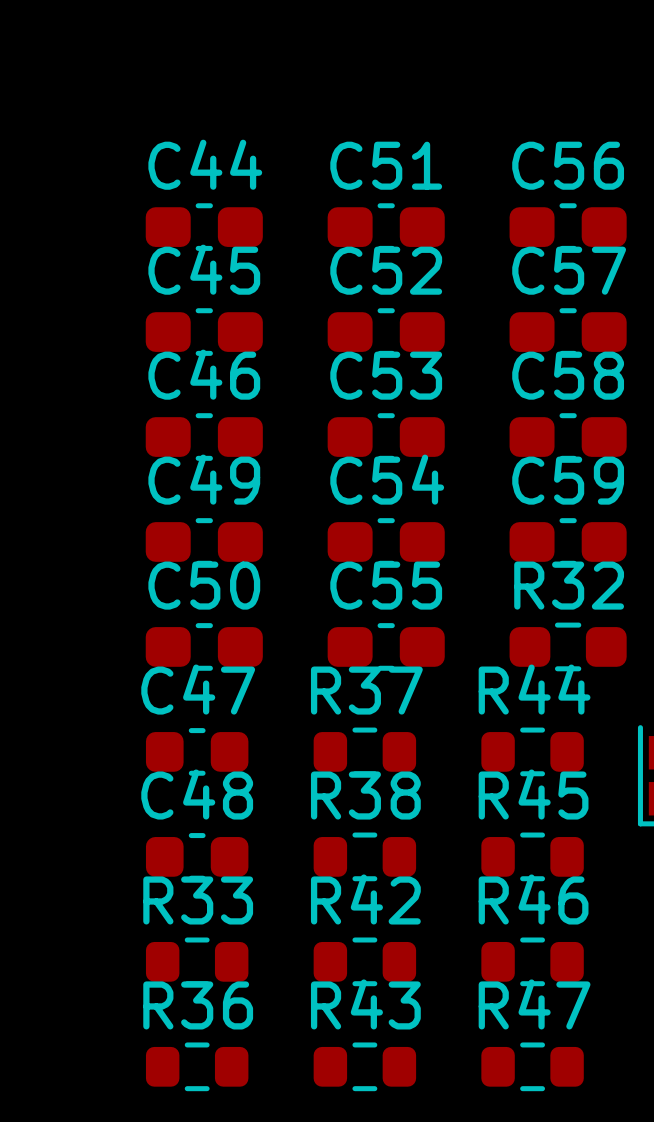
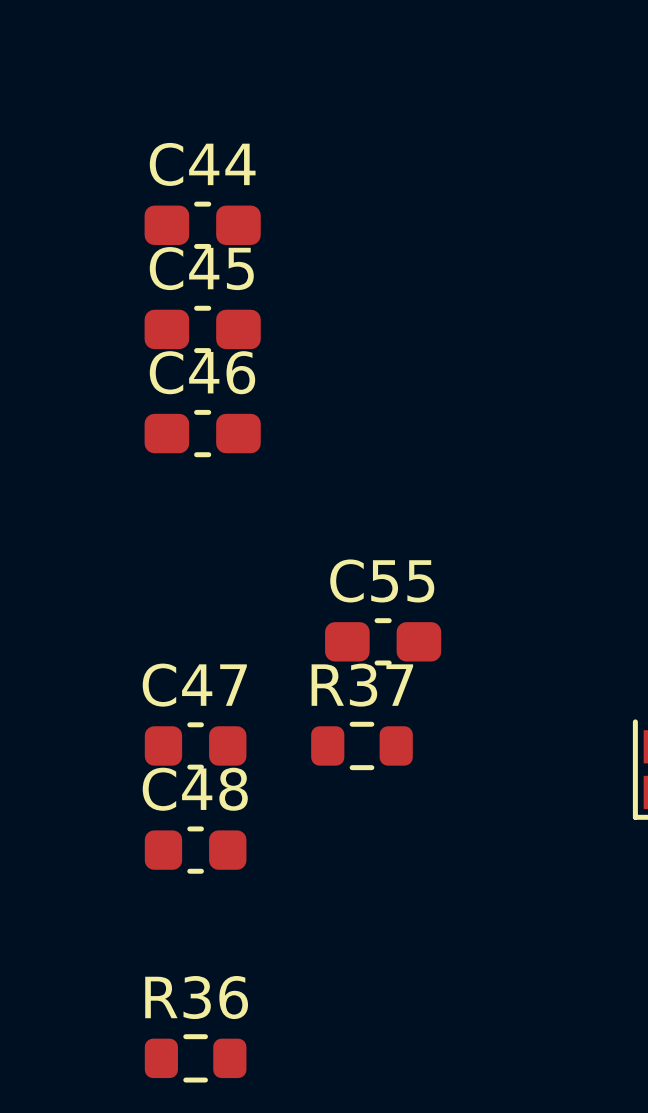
C51: (386, 227) -> none
C56: (568, 227) -> none
C52: (386, 332) -> none
C57: (568, 332) -> none
C53: (386, 437) -> none
C58: (568, 437) -> none
C49: (204, 541) -> none
C54: (386, 541) -> none
C59: (568, 541) -> none
C50: (204, 646) -> none
R32: (568, 646) -> none
R44: (532, 751) -> none
R38: (364, 856) -> none
R45: (532, 856) -> none
R33: (197, 961) -> none
R42: (364, 961) -> none
R46: (532, 961) -> none
R43: (364, 1066) -> none
R47: (532, 1066) -> none

